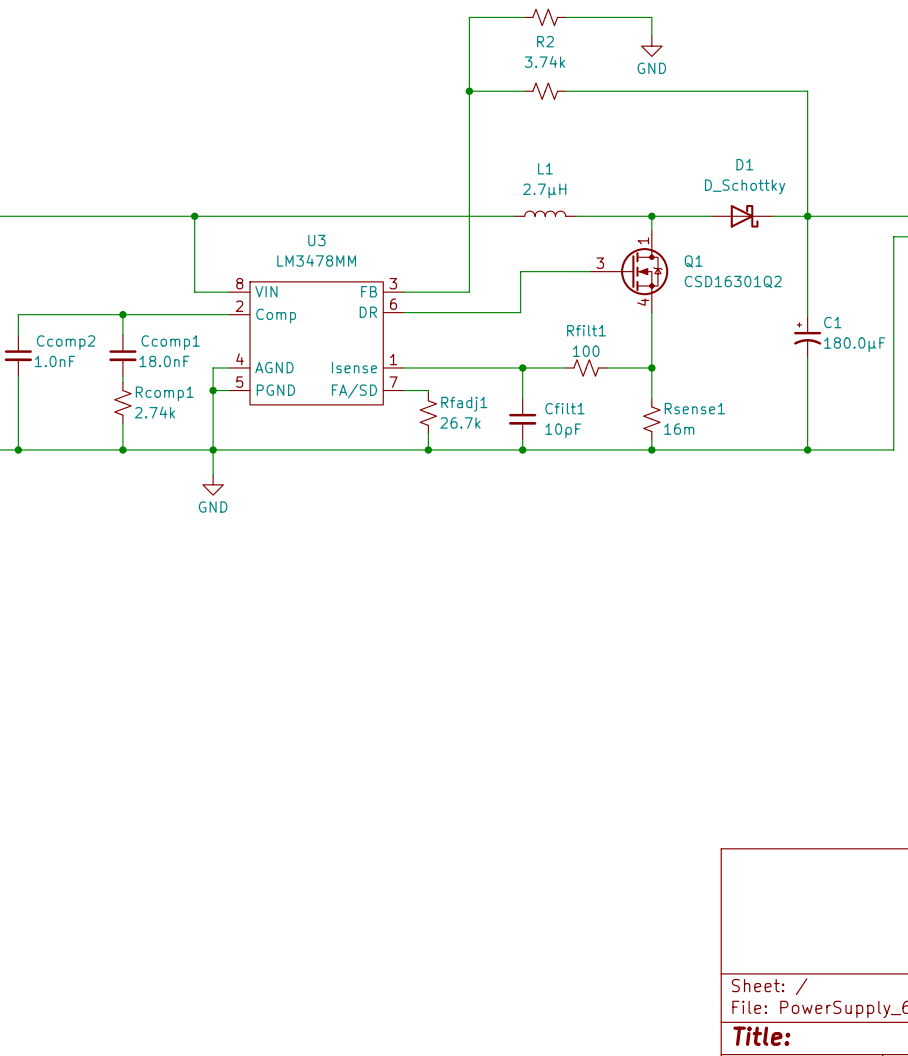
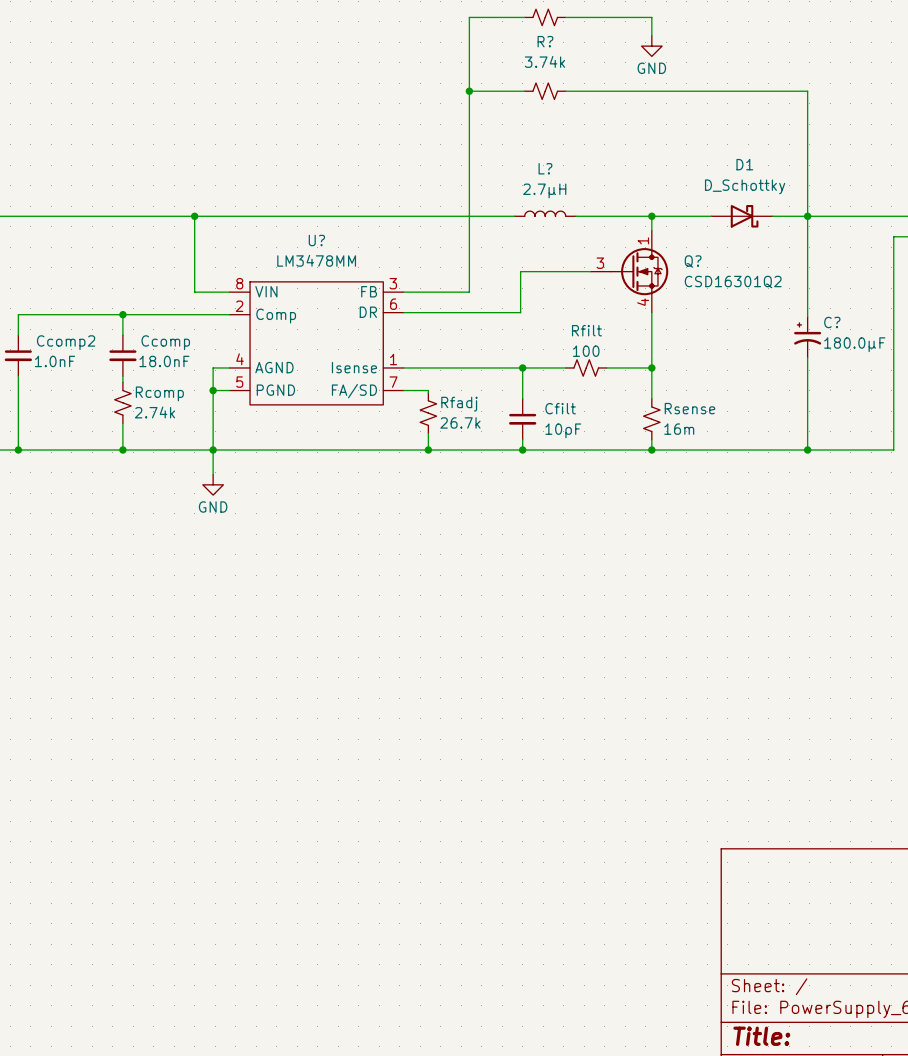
R2 name: R2 (545, 41) -> R? (545, 41)
L1 name: L1 (545, 168) -> L? (545, 168)
U3 name: U3 (316, 240) -> U? (316, 240)
Q1 name: Q1 (693, 261) -> Q? (693, 261)
C1 name: C1 (832, 322) -> C? (832, 322)
Rfilt1 name: Rfilt1 (586, 330) -> Rfilt (586, 330)
Ccomp1 name: Ccomp1 (170, 342) -> Ccomp (165, 342)
Rcomp1 name: Rcomp1 (164, 393) -> Rcomp (159, 393)
Rfadj1 name: Rfadj1 (464, 404) -> Rfadj (459, 404)
Cfilt1 name: Cfilt1 (564, 408) -> Cfilt (560, 408)
Rsense1 name: Rsense1 (694, 408) -> Rsense (689, 408)

